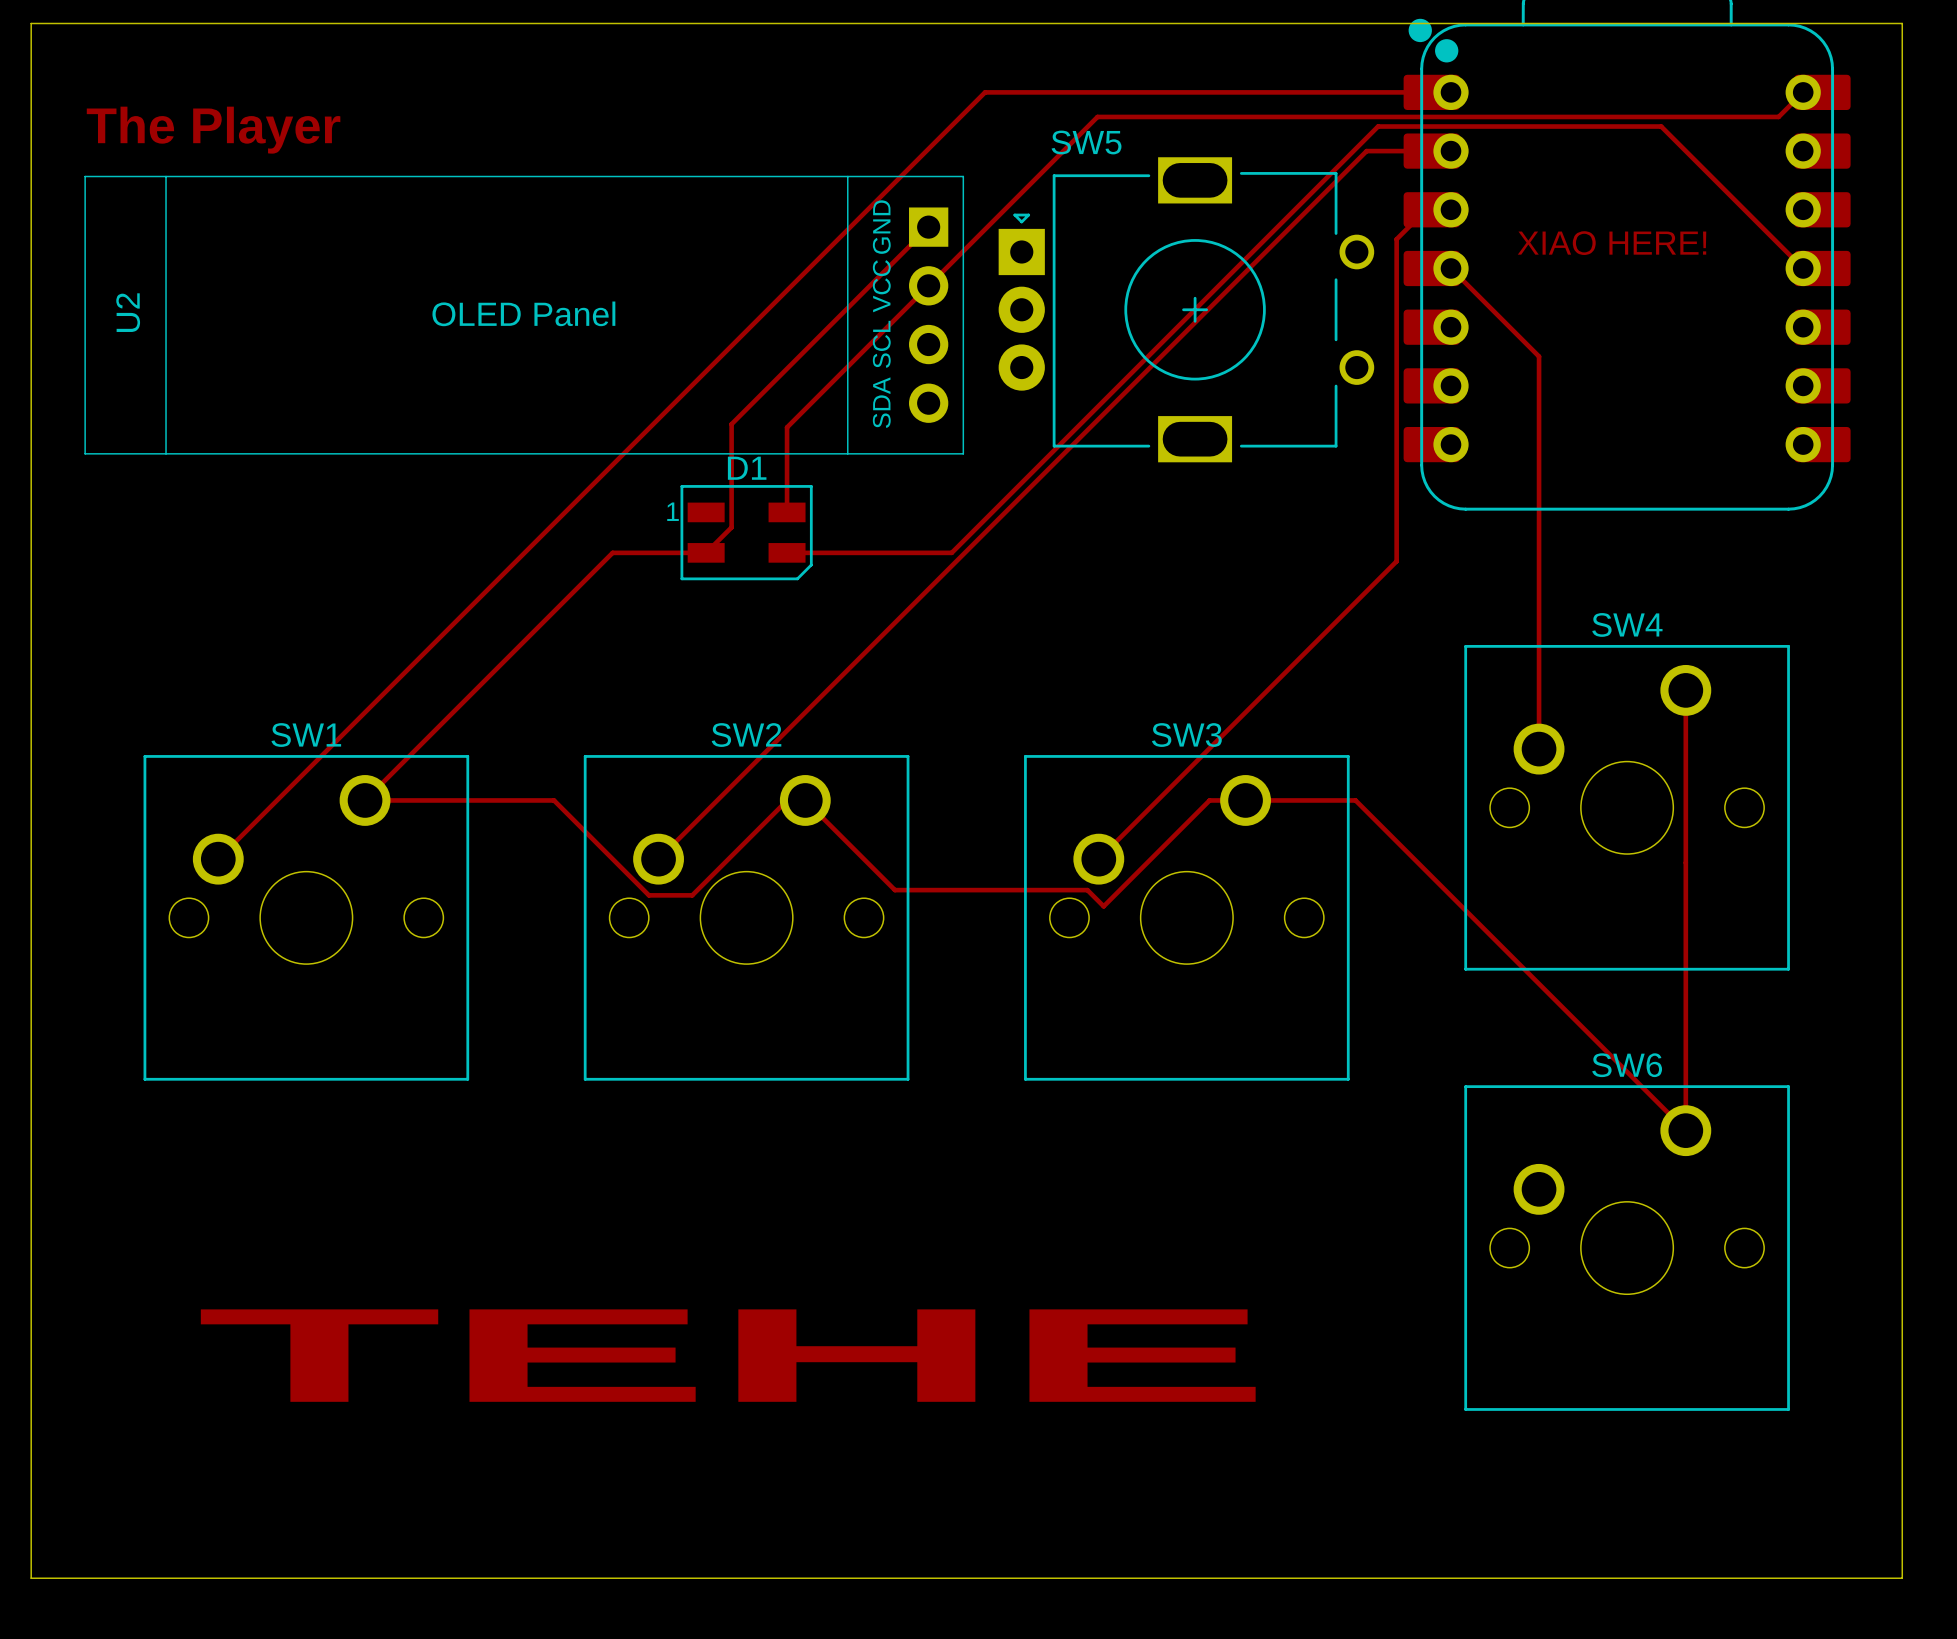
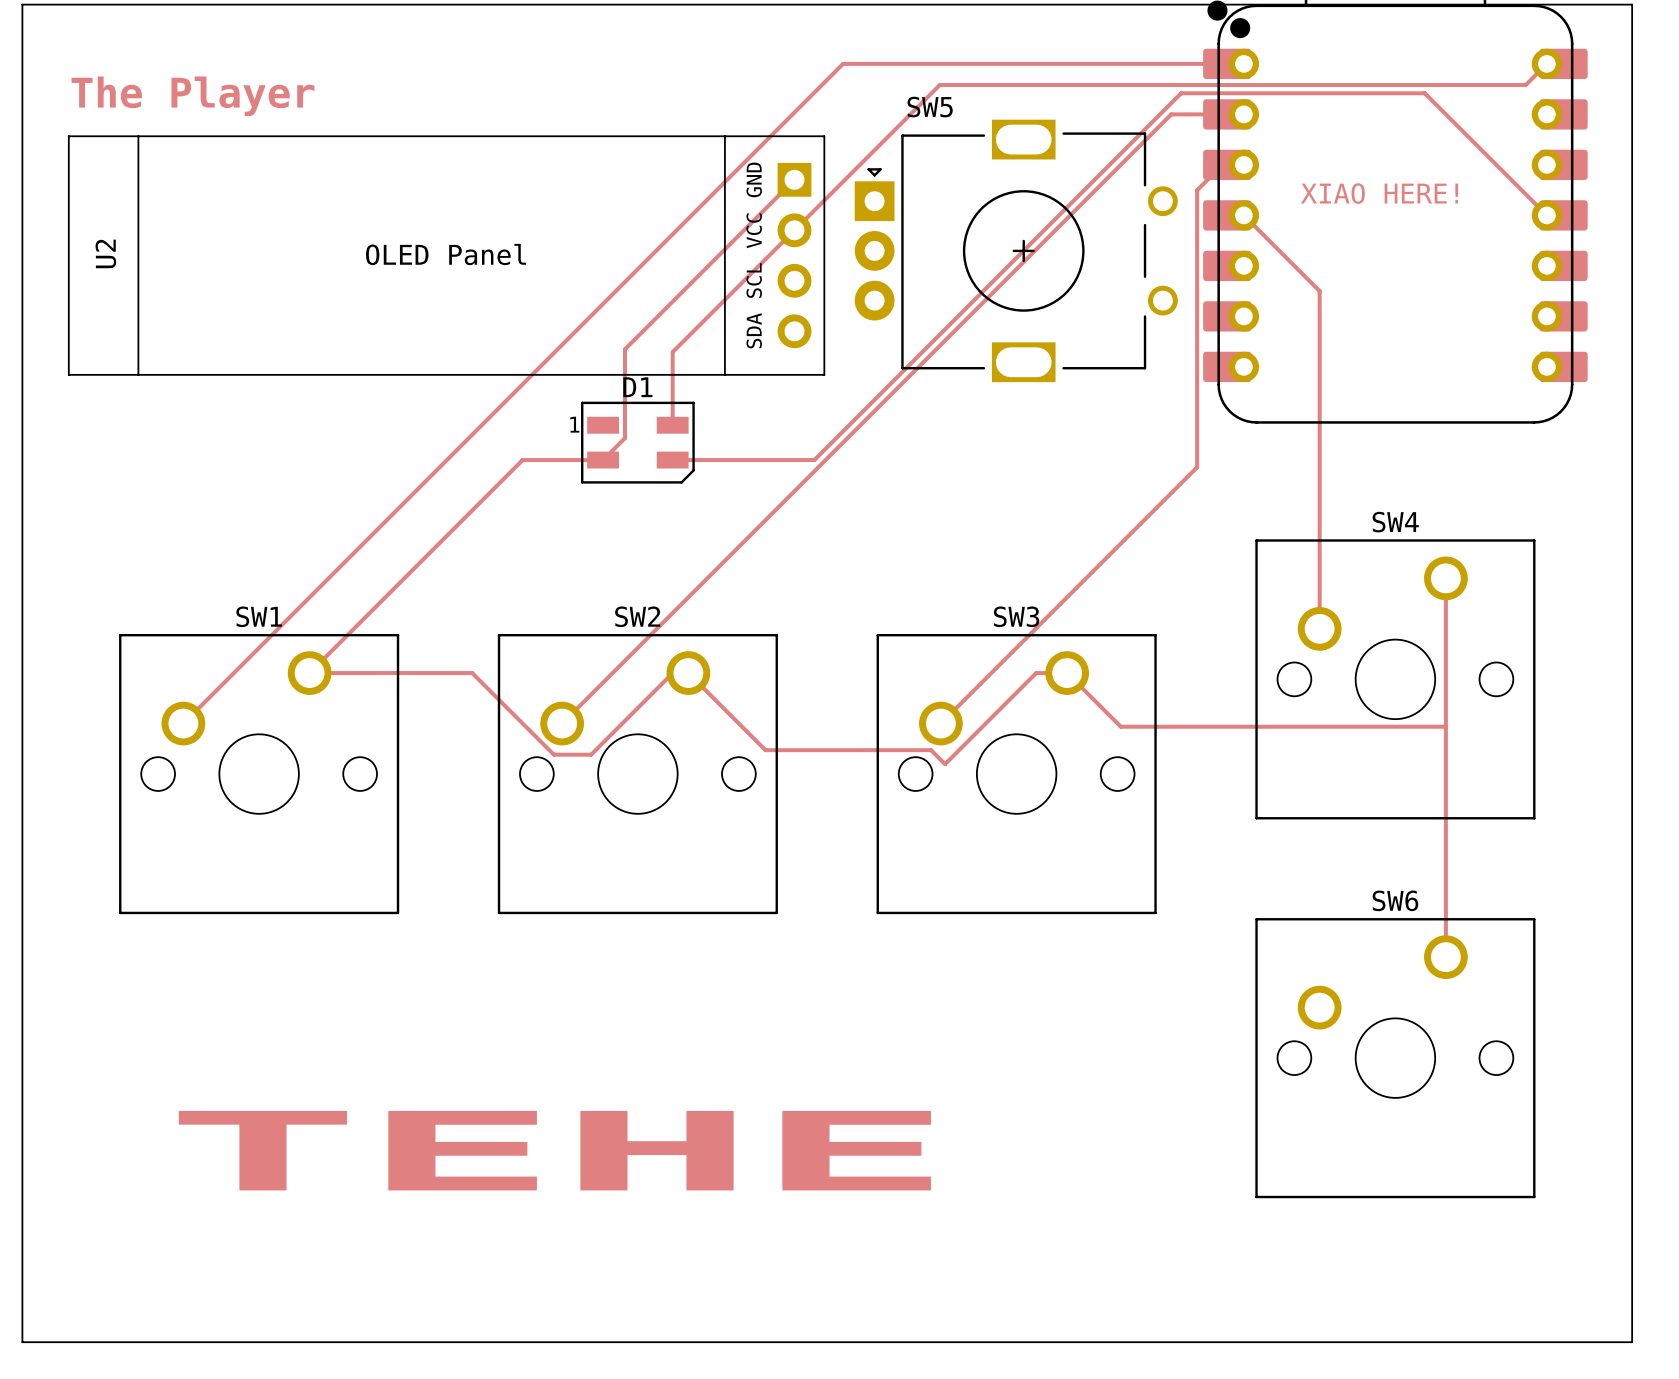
track: (1245, 800) (1355, 800) (1685, 1130) -> (1067, 673) (1120, 726) (1445, 726)

